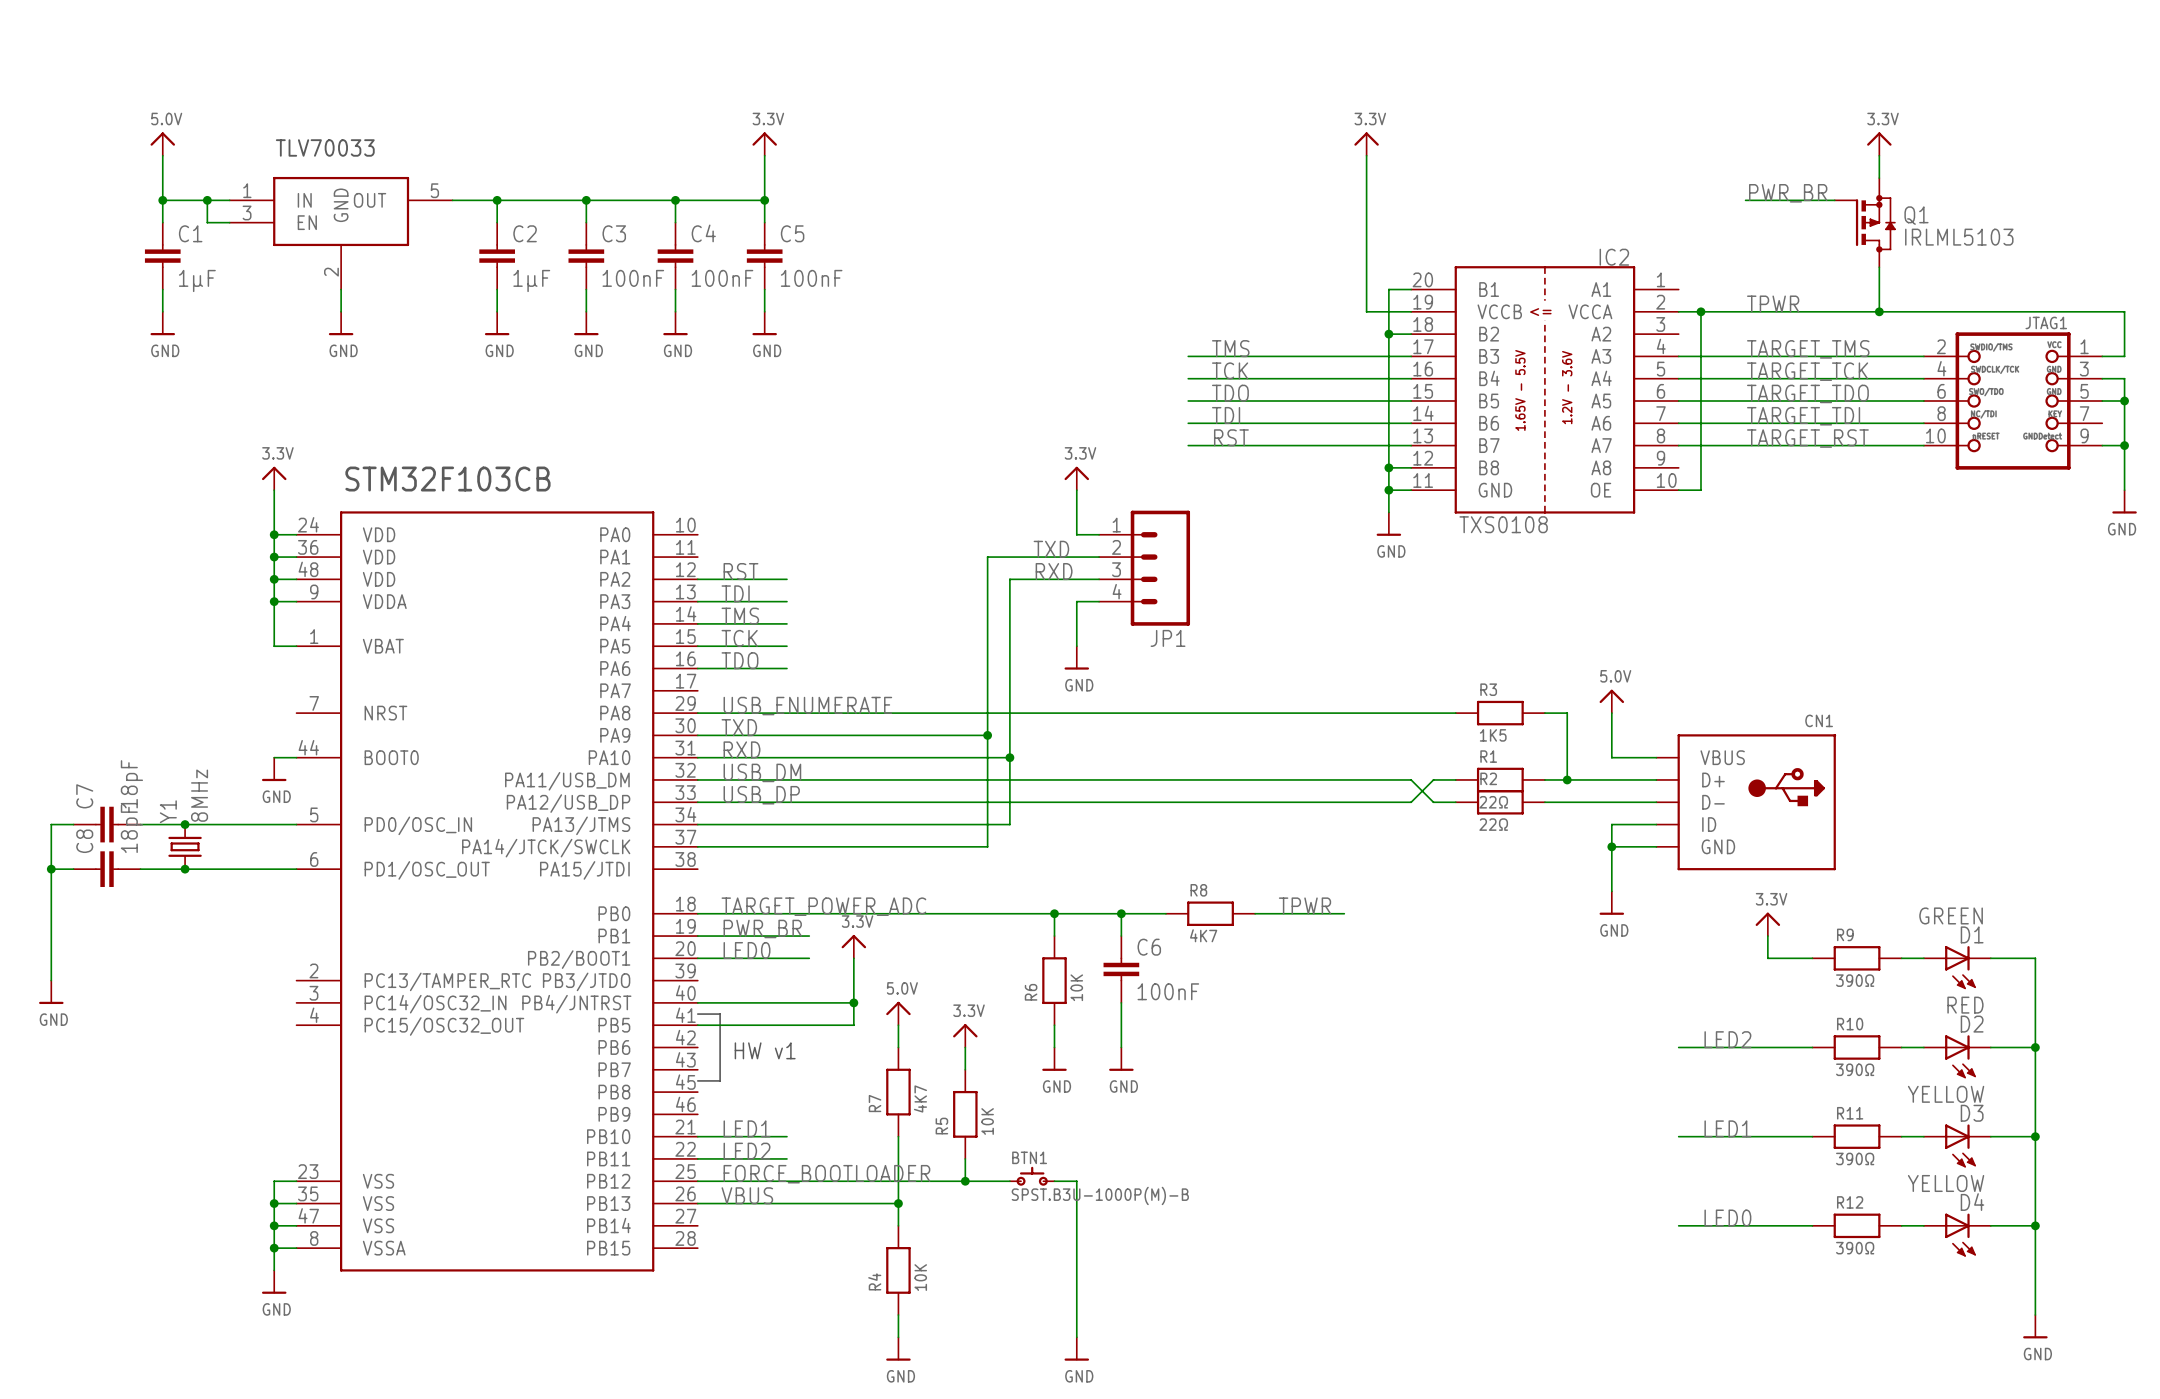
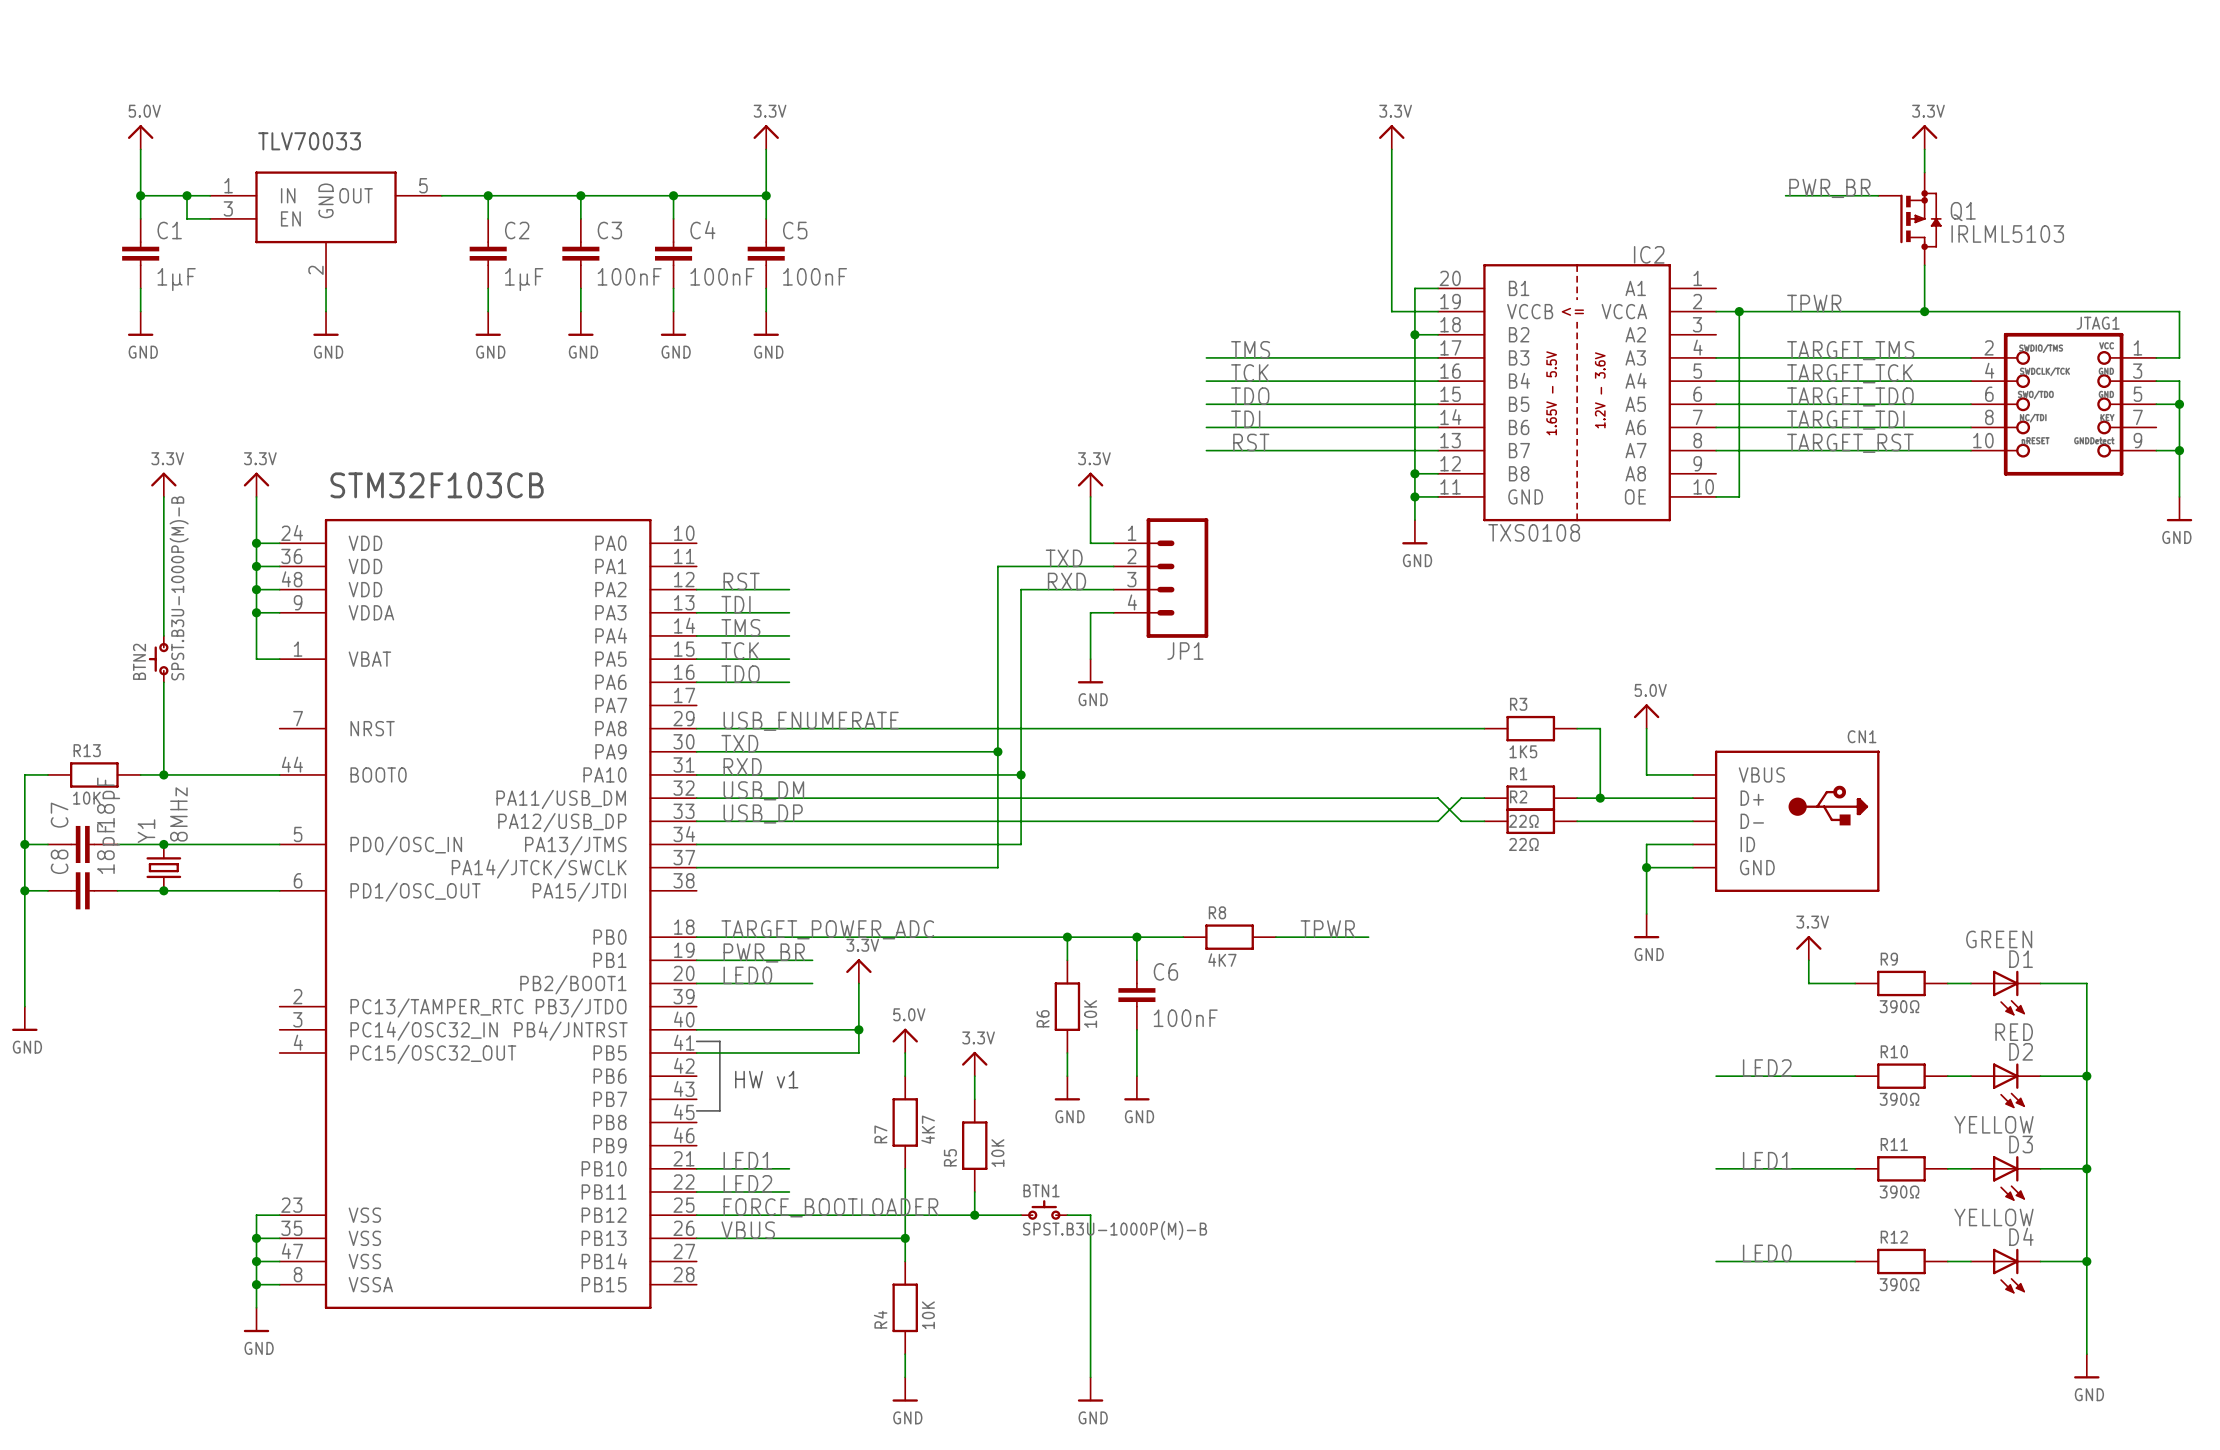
power symbol: none -> 3.3V (163, 484)
wire: none -> (163, 496) (163, 635)
BTN2: none -> SPST.B3U-1000P(M)-B (158, 659)
wire: none -> (163, 682) (163, 774)
wire: none -> (47, 774) (24, 774) (24, 844)
R13: none -> 10K (94, 774)
wire: none -> (140, 774) (256, 774)
junction: none -> (163, 774)
power symbol: GND (274, 769) -> none
junction: none -> (24, 844)

